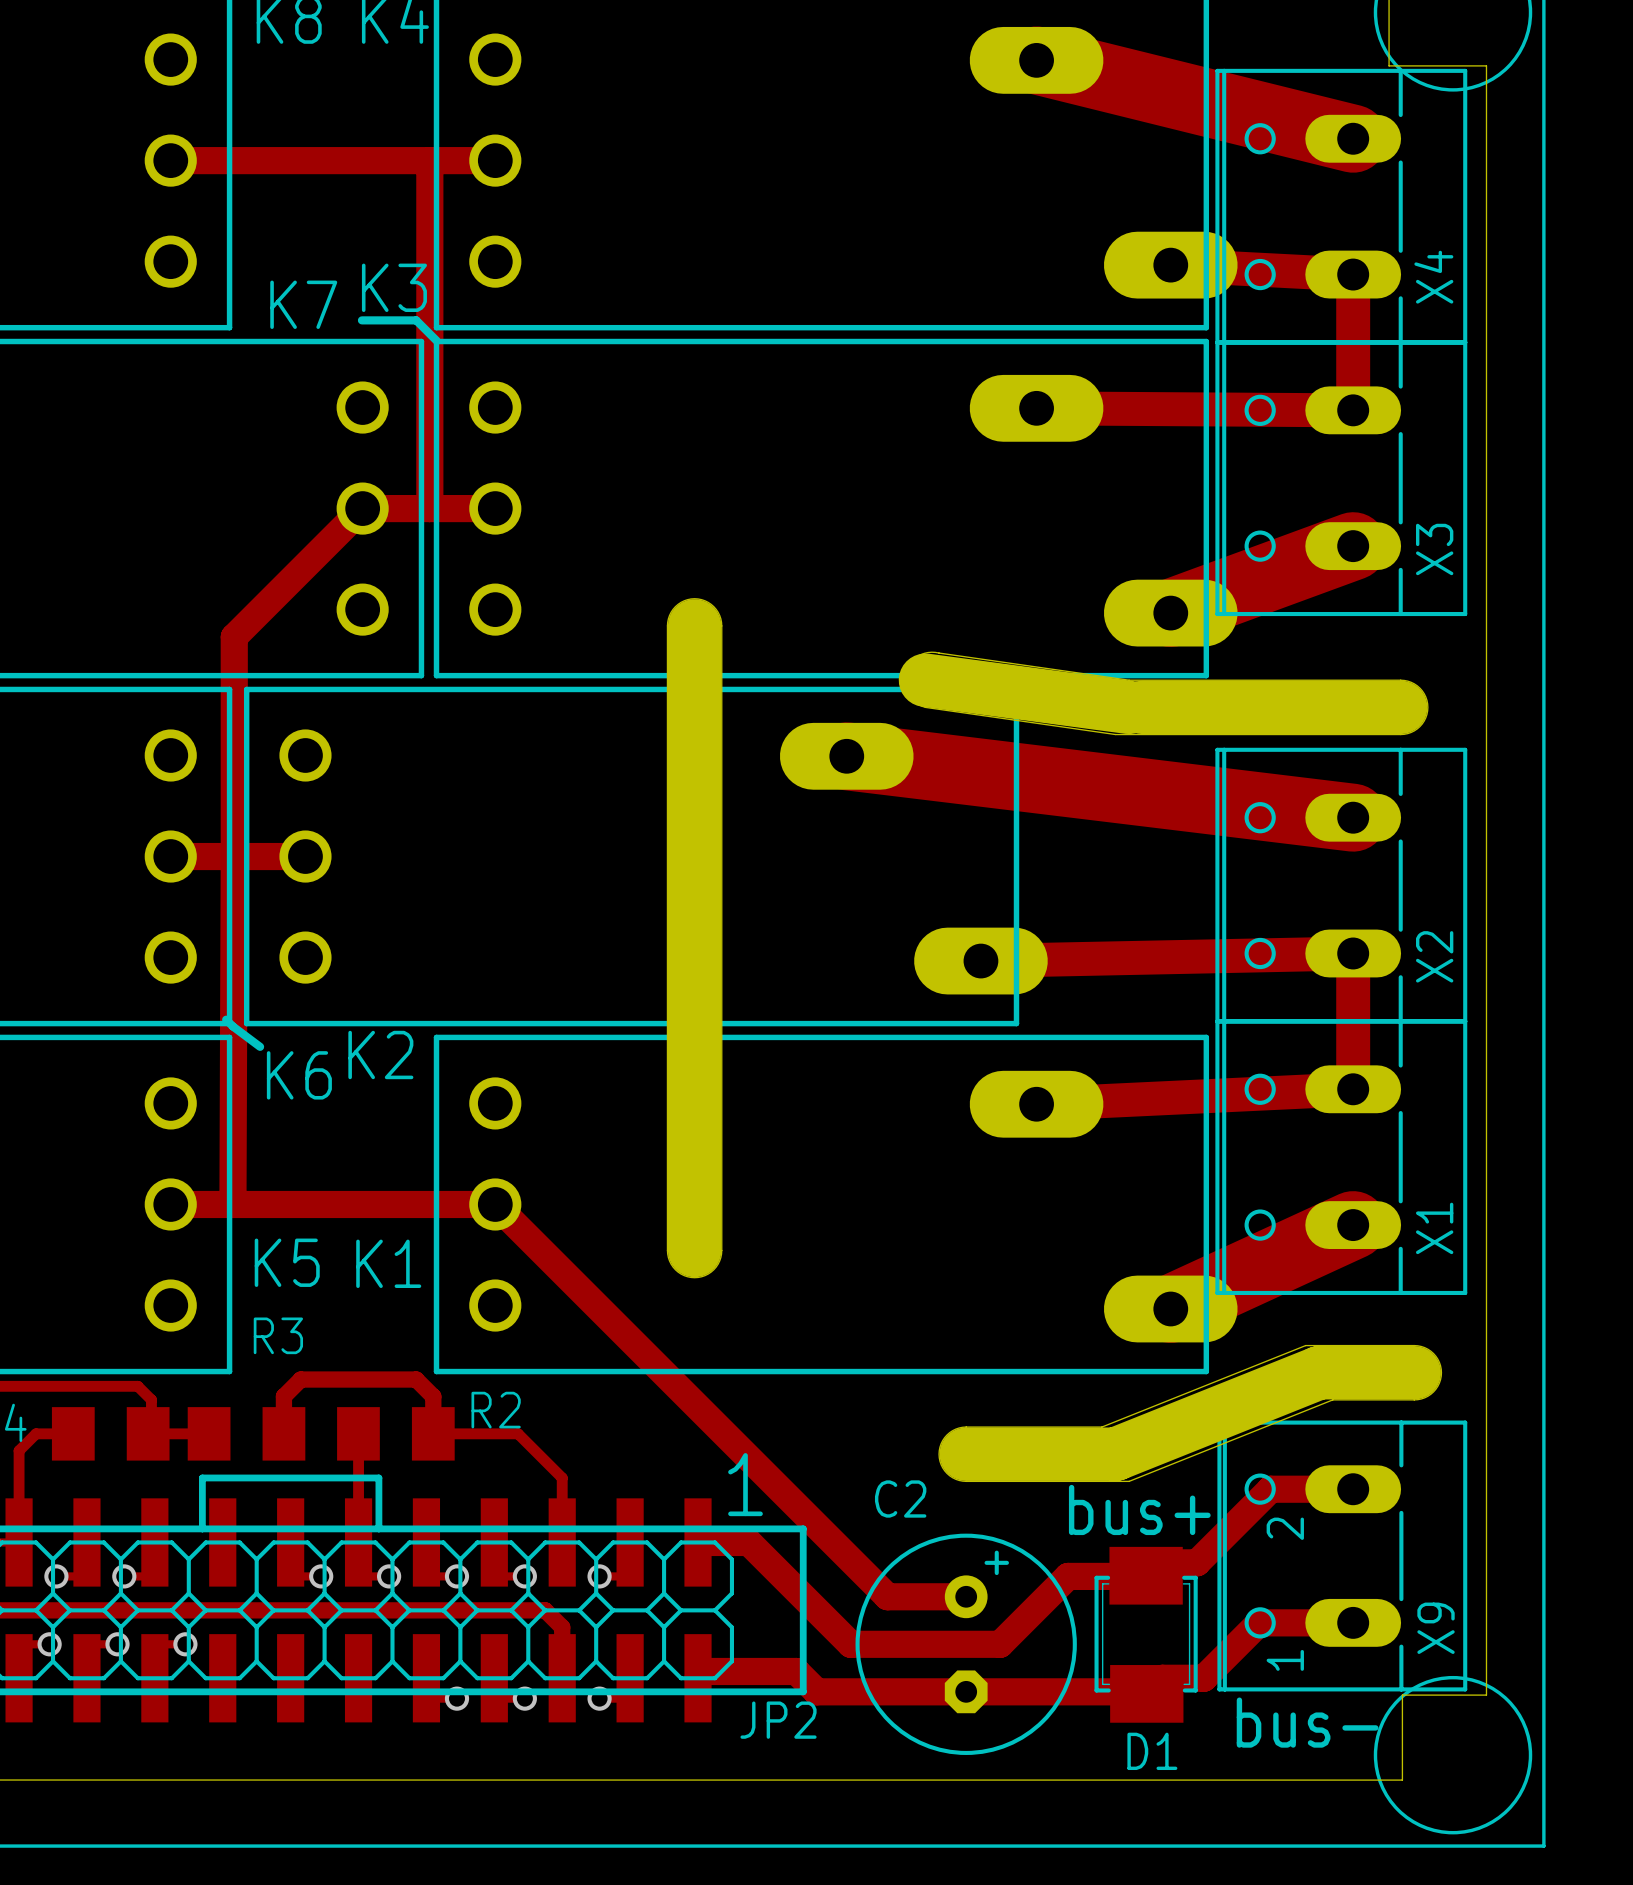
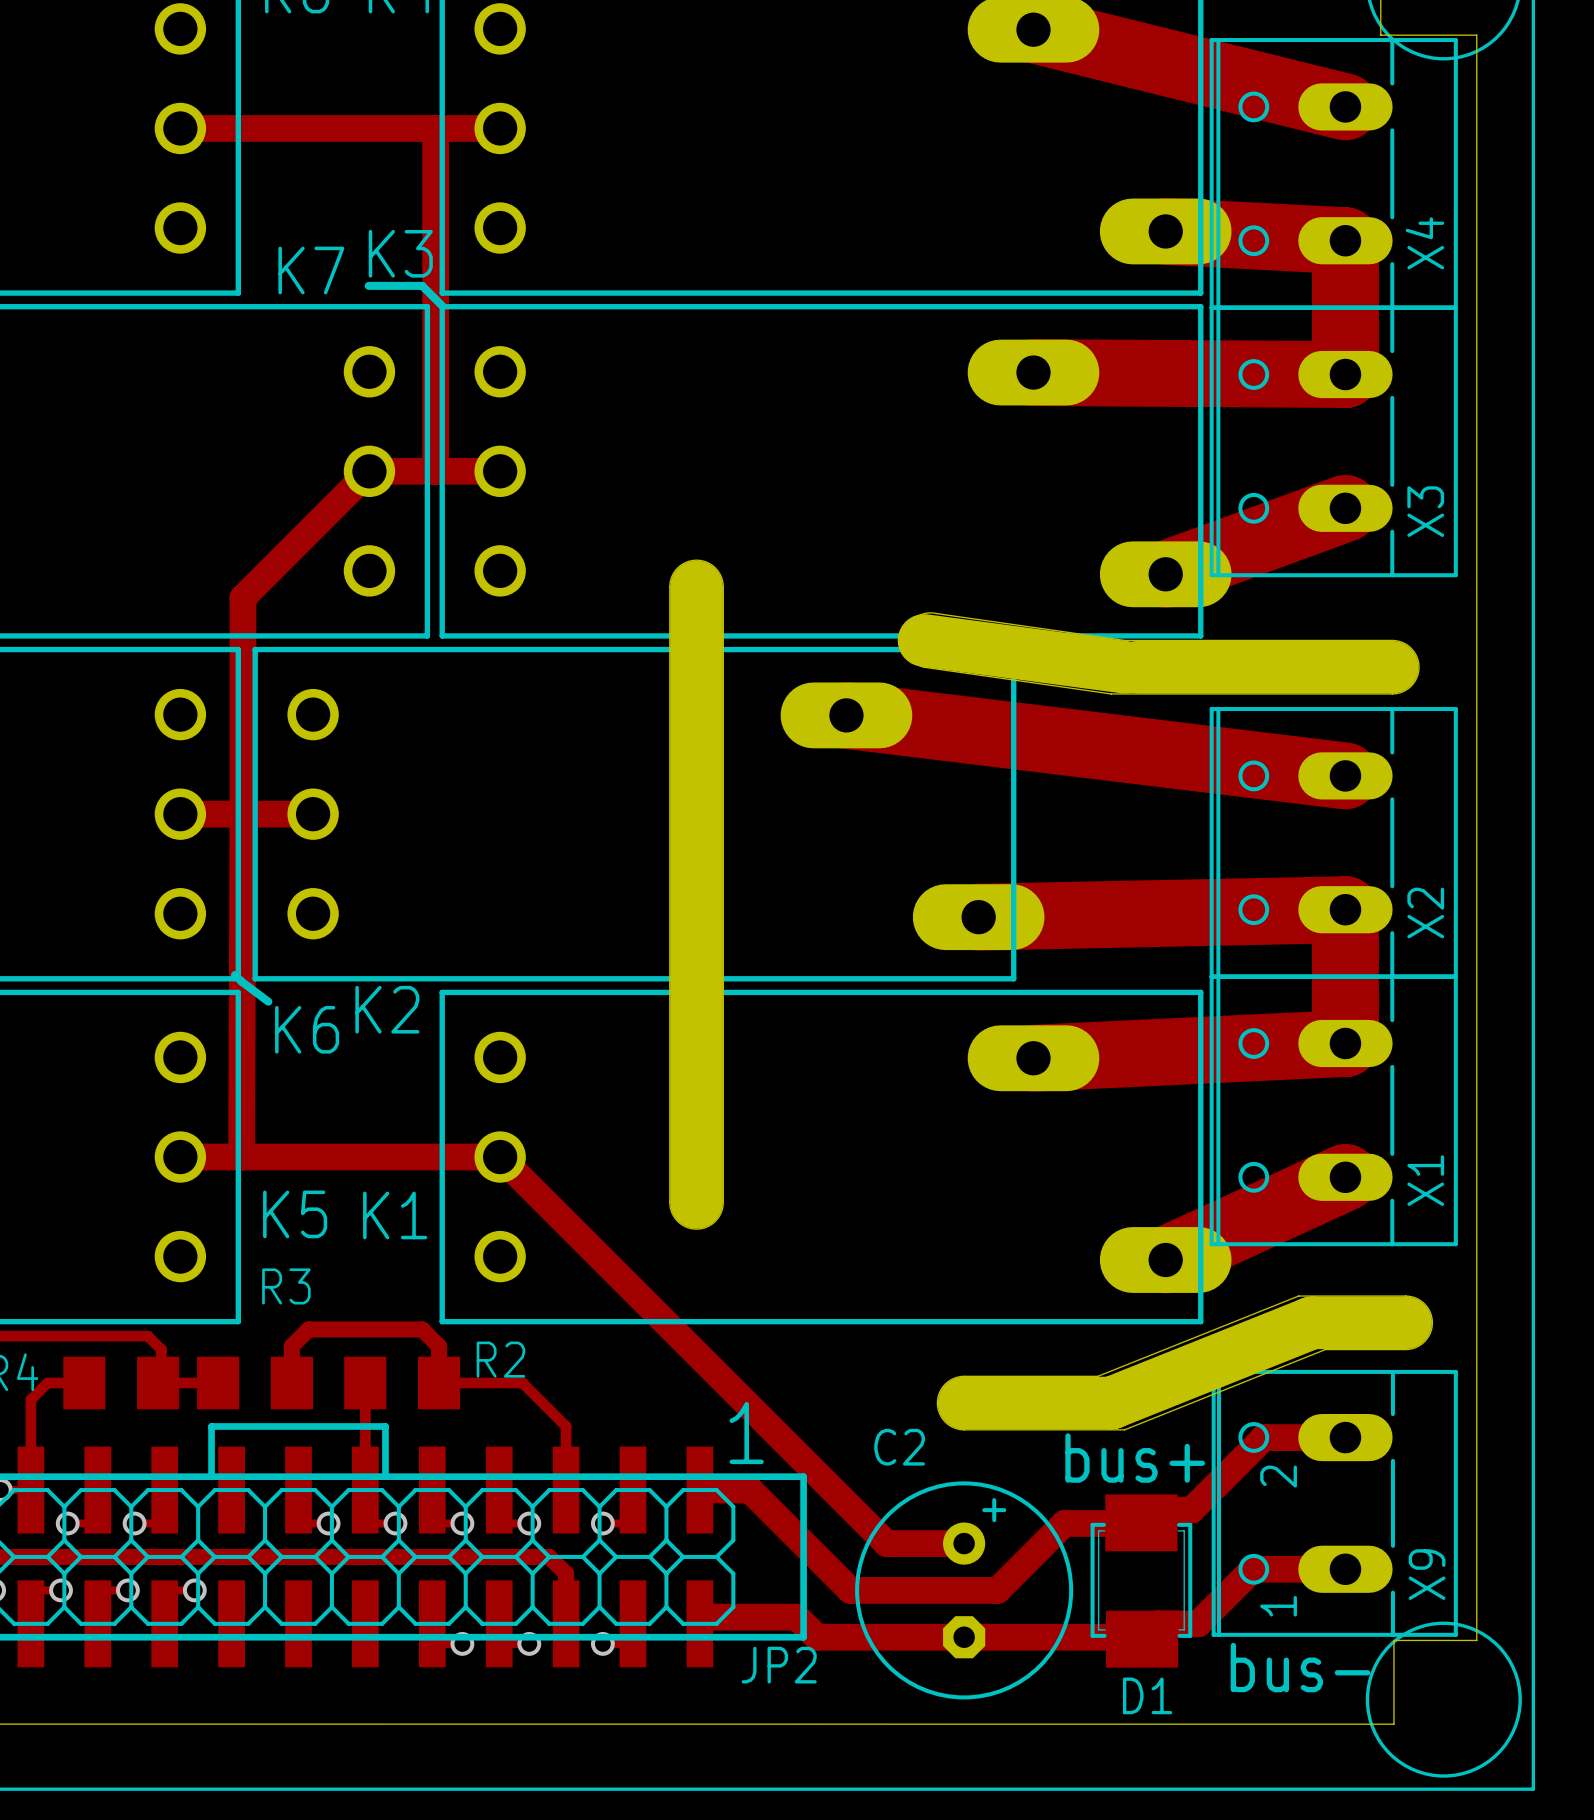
track width: thin (1170, 265) (1353, 274) (1353, 410) (1036, 408) -> thick (1165, 231) (1345, 240) (1345, 374) (1033, 372)
track width: thin (980, 961) (1353, 953) (1353, 1089) (1036, 1104) -> thick (978, 917) (1345, 909) (1345, 1043) (1033, 1058)

